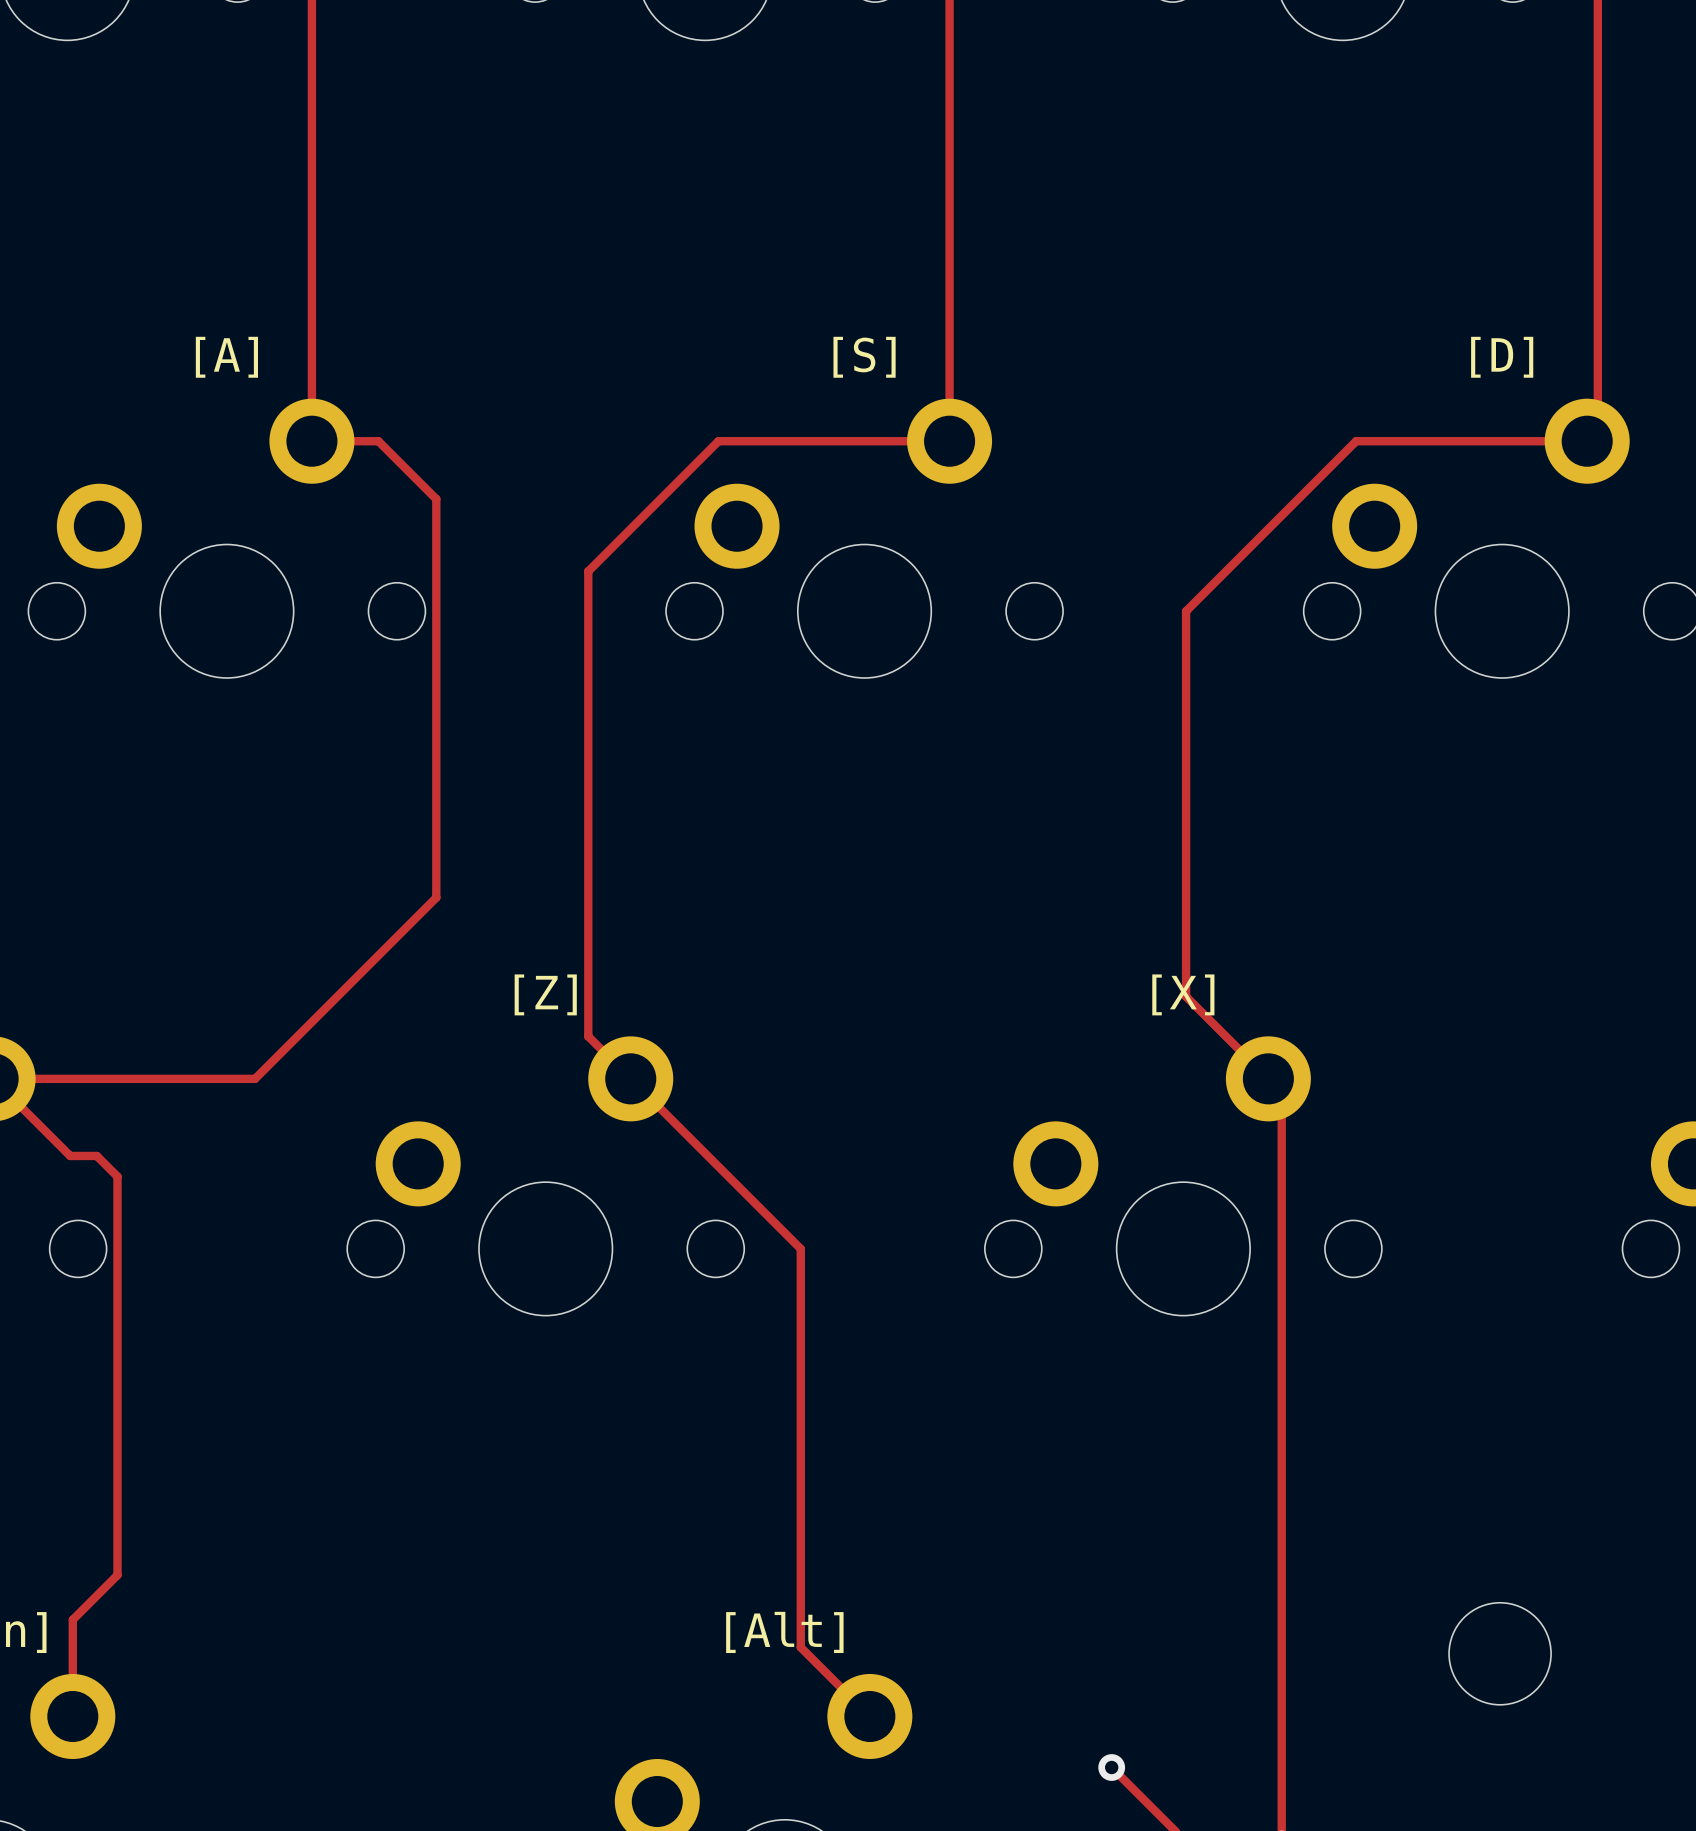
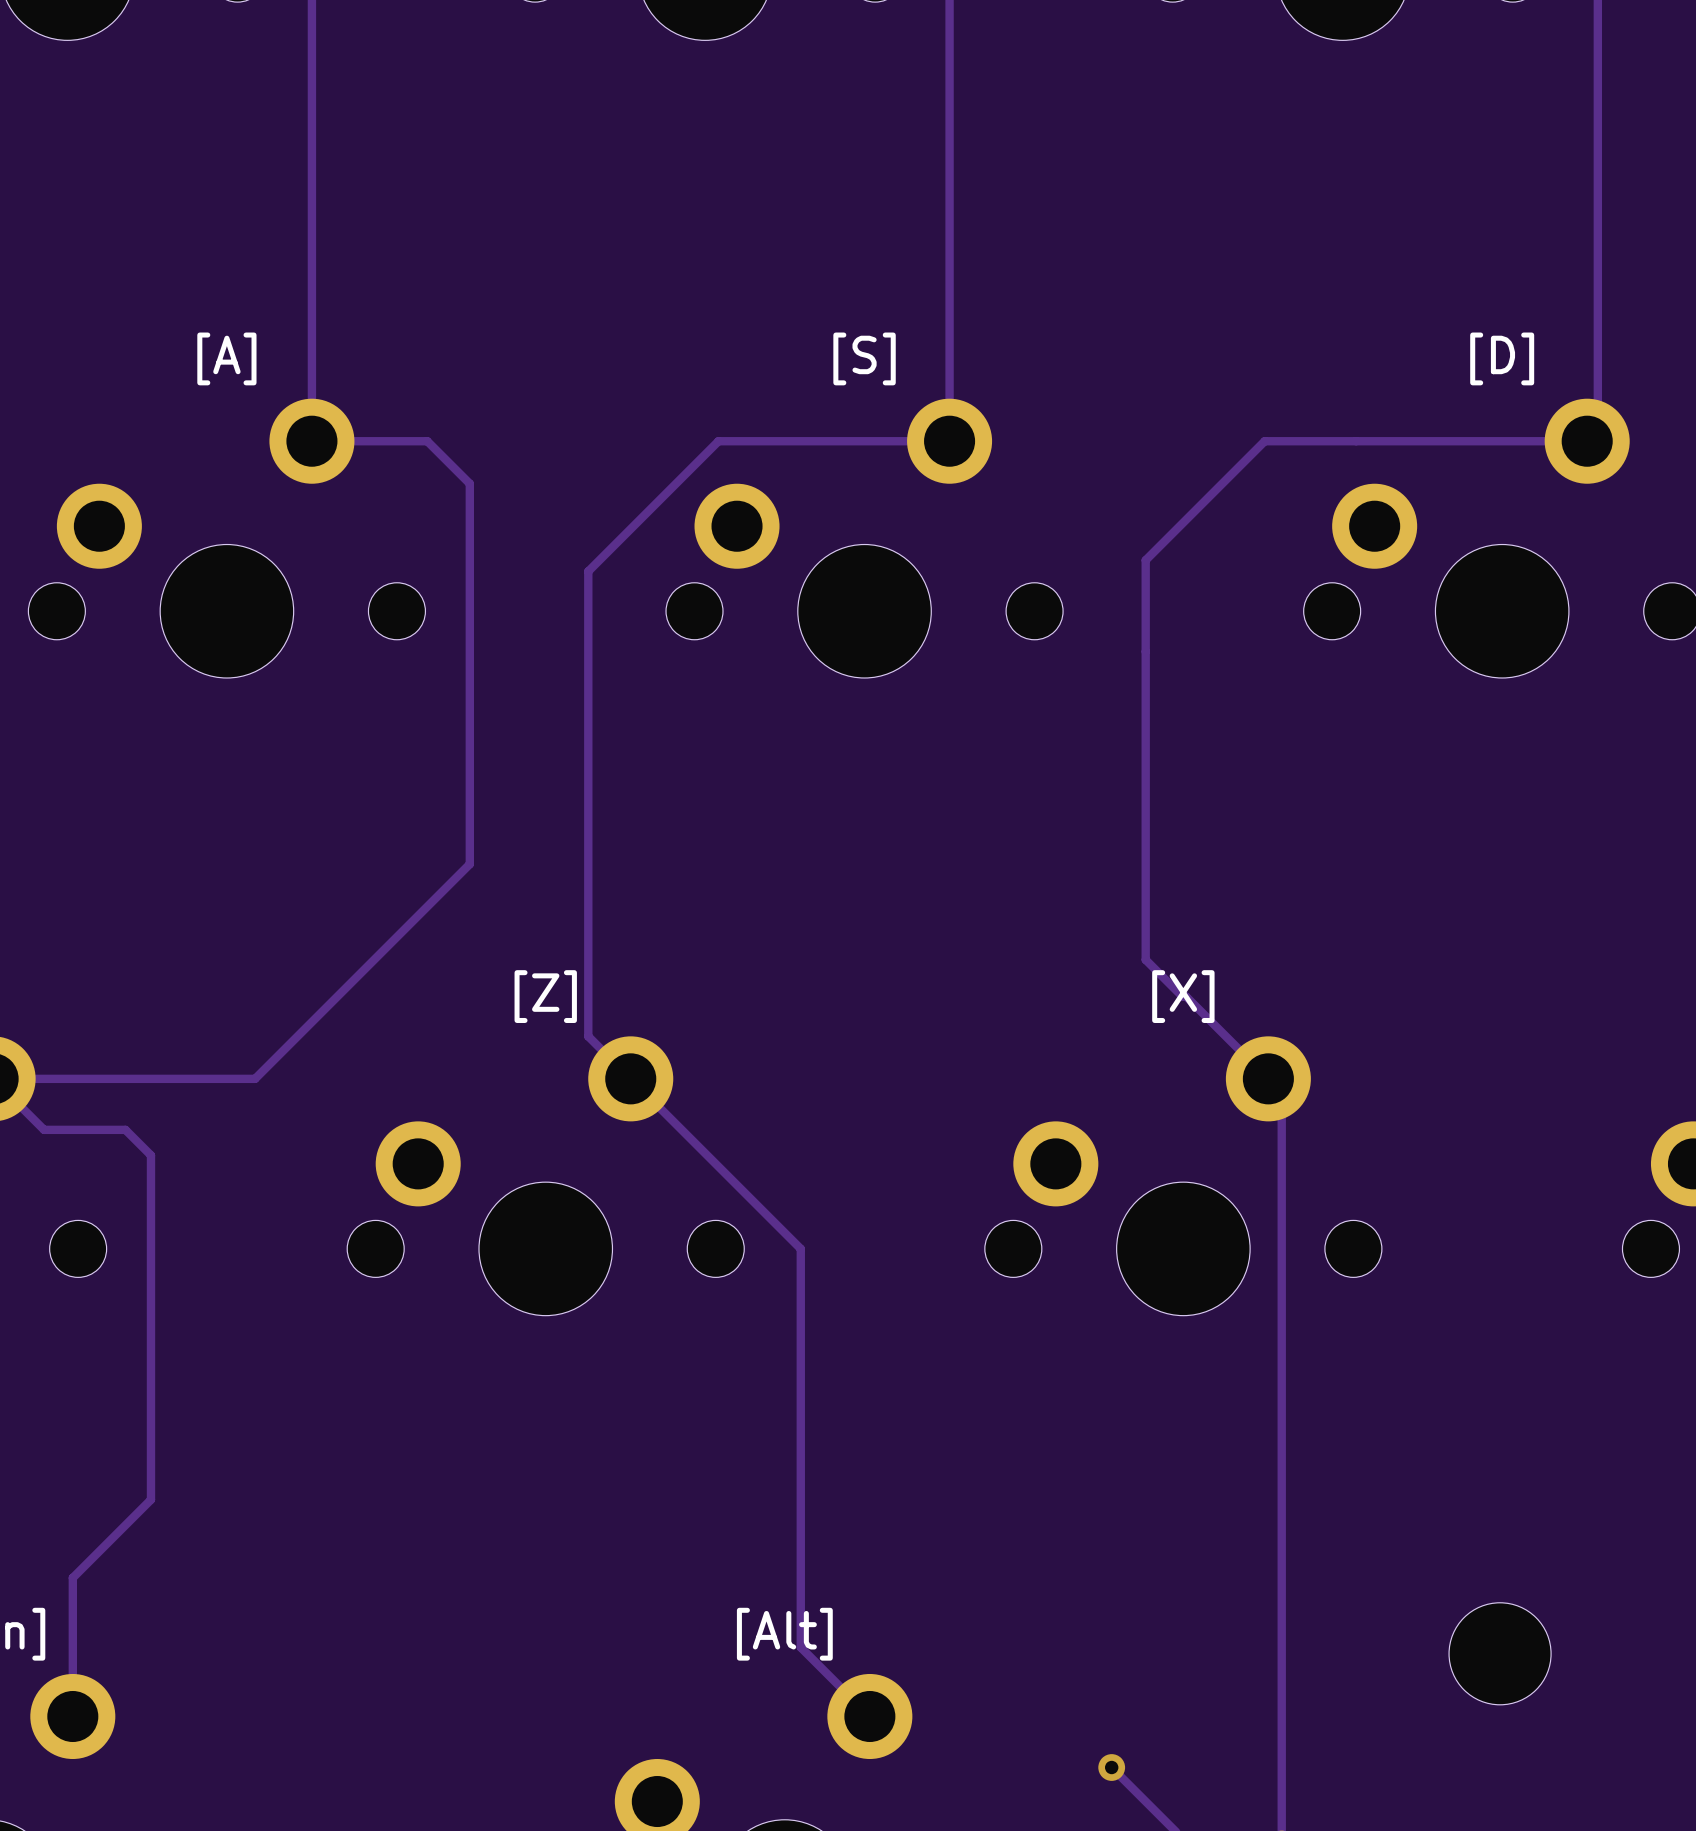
track: (378, 441) (436, 499) (436, 897) -> (378, 441) (427, 441) (469, 483) (469, 864) (436, 897)
track: (1356, 441) (1186, 611) (1186, 996) -> (1356, 441) (1264, 441) (1145, 560) (1145, 959) (1182, 996) (1186, 996)
track: (44, 1129) (70, 1155) (96, 1155) (117, 1176) (117, 1575) (72, 1619) -> (44, 1129) (125, 1129) (150, 1155) (150, 1499) (72, 1577) (72, 1619)

